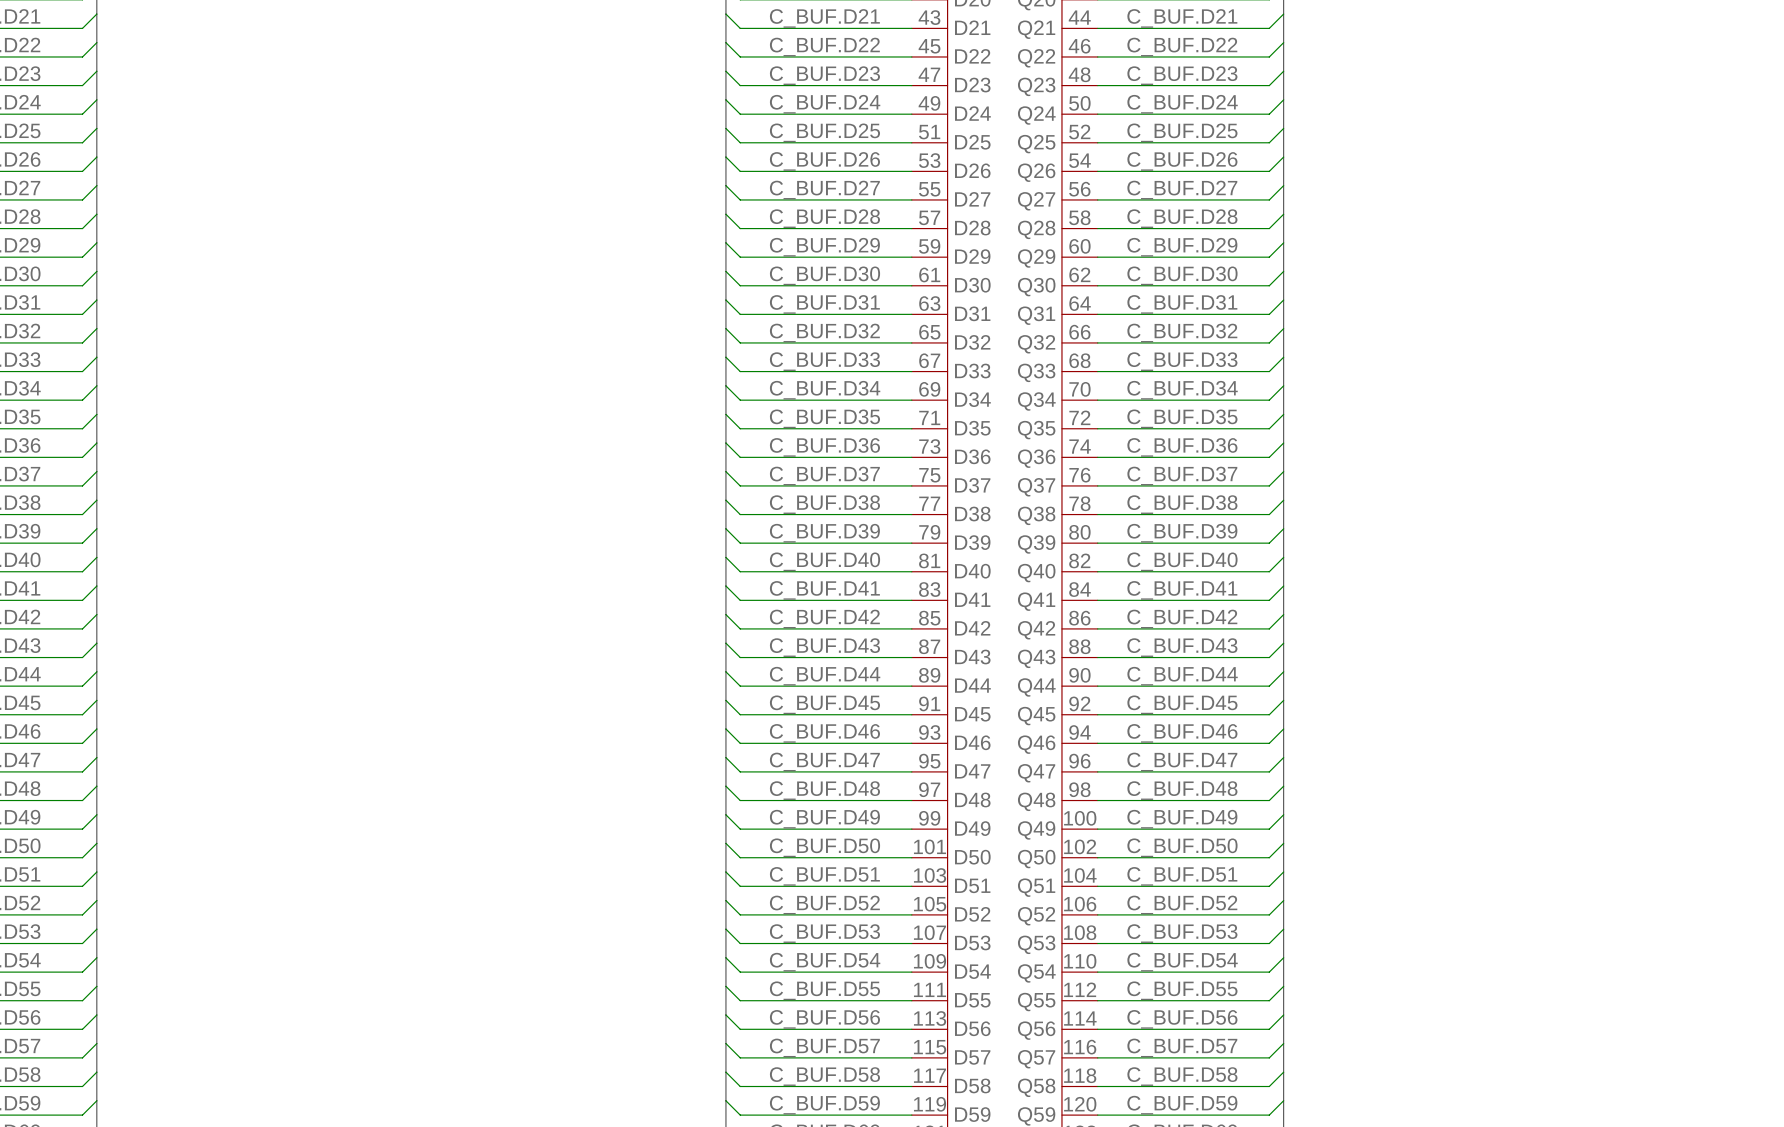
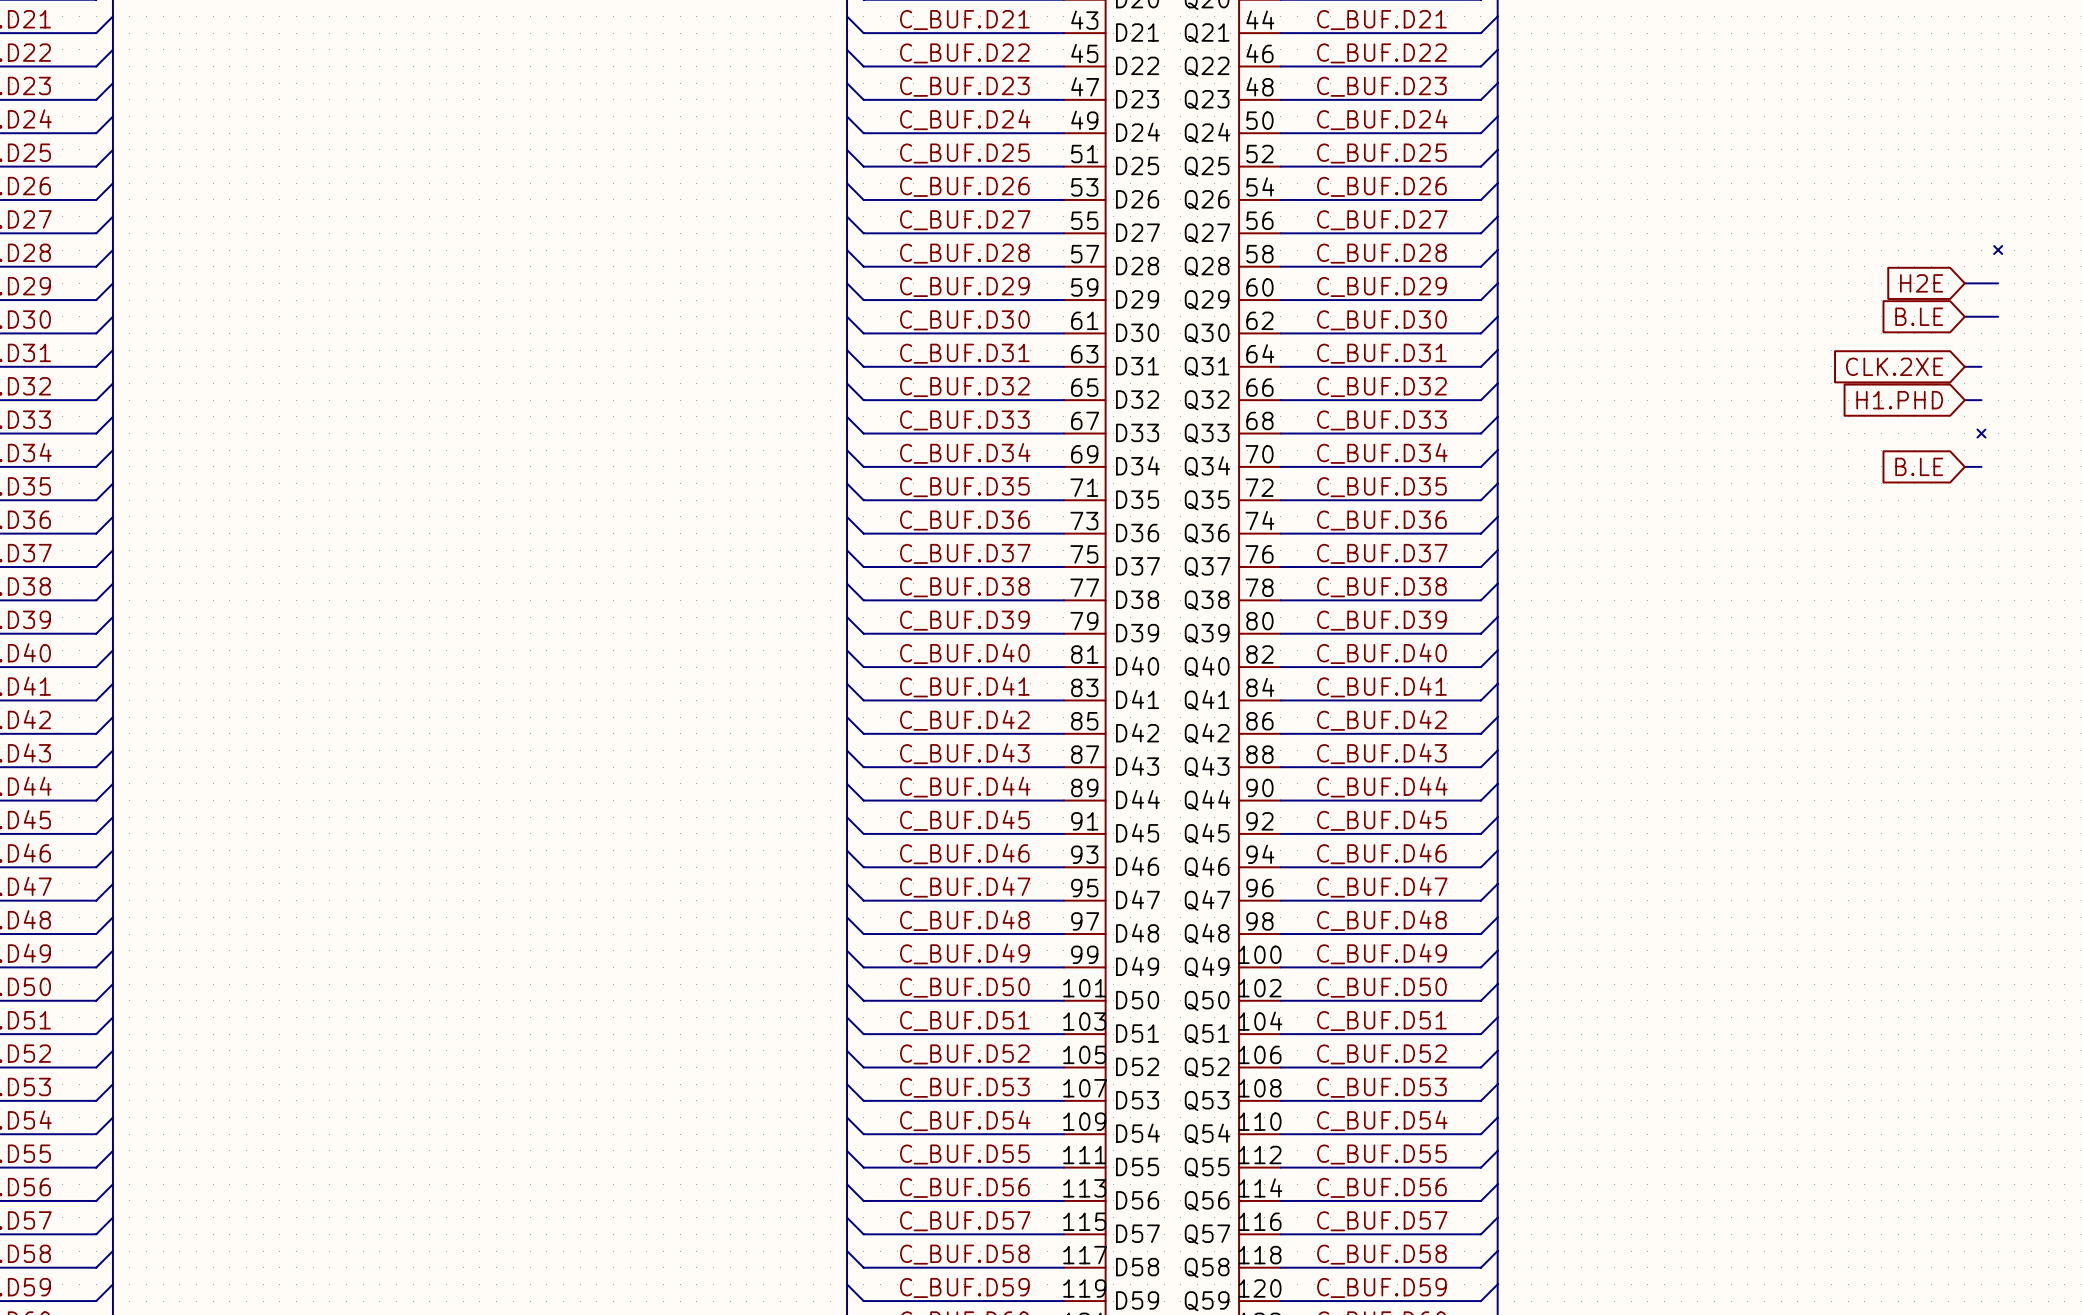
no-connect mark: none -> (1998, 250)
global label: none -> H2E (1921, 283)
wire: none -> (1964, 283) (1998, 283)
global label: none -> B.LE (1919, 316)
wire: none -> (1964, 316) (1998, 316)
global label: none -> CLK.2XE (1894, 366)
wire: none -> (1964, 366) (1981, 366)
global label: none -> H1.PHD (1899, 400)
wire: none -> (1964, 400) (1981, 400)
no-connect mark: none -> (1981, 433)
global label: none -> B.LE (1919, 466)
wire: none -> (1964, 466) (1981, 466)

